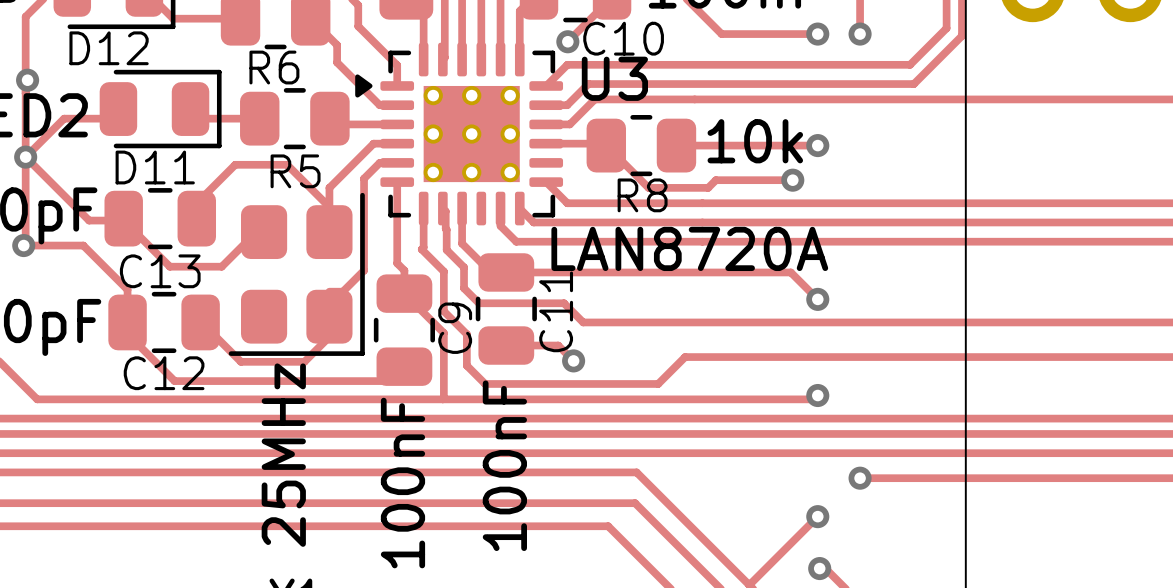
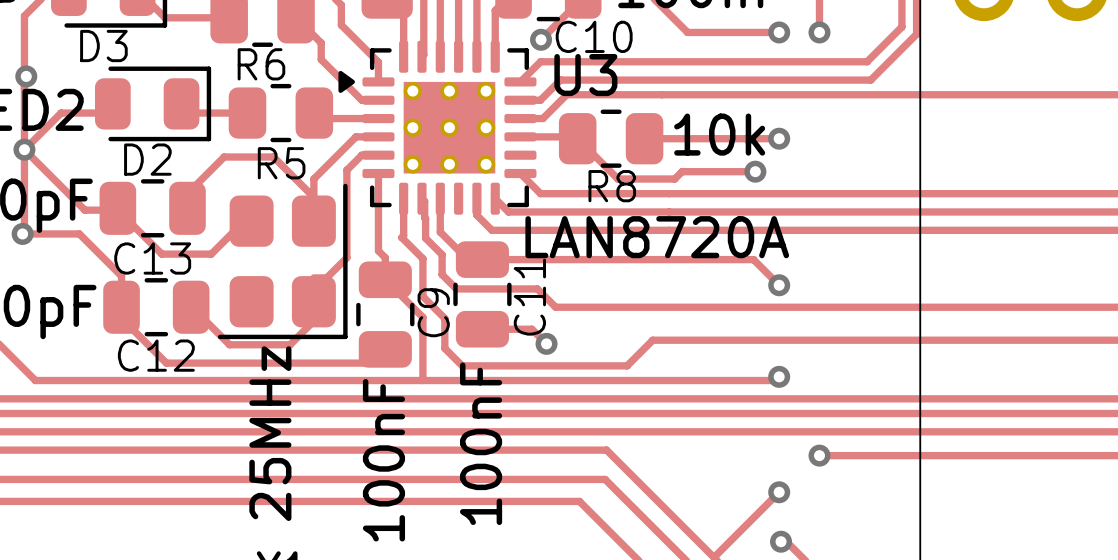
D12 name: D12 (109, 48) -> D3 (103, 46)
D11 name: D11 (155, 167) -> D2 (147, 159)

